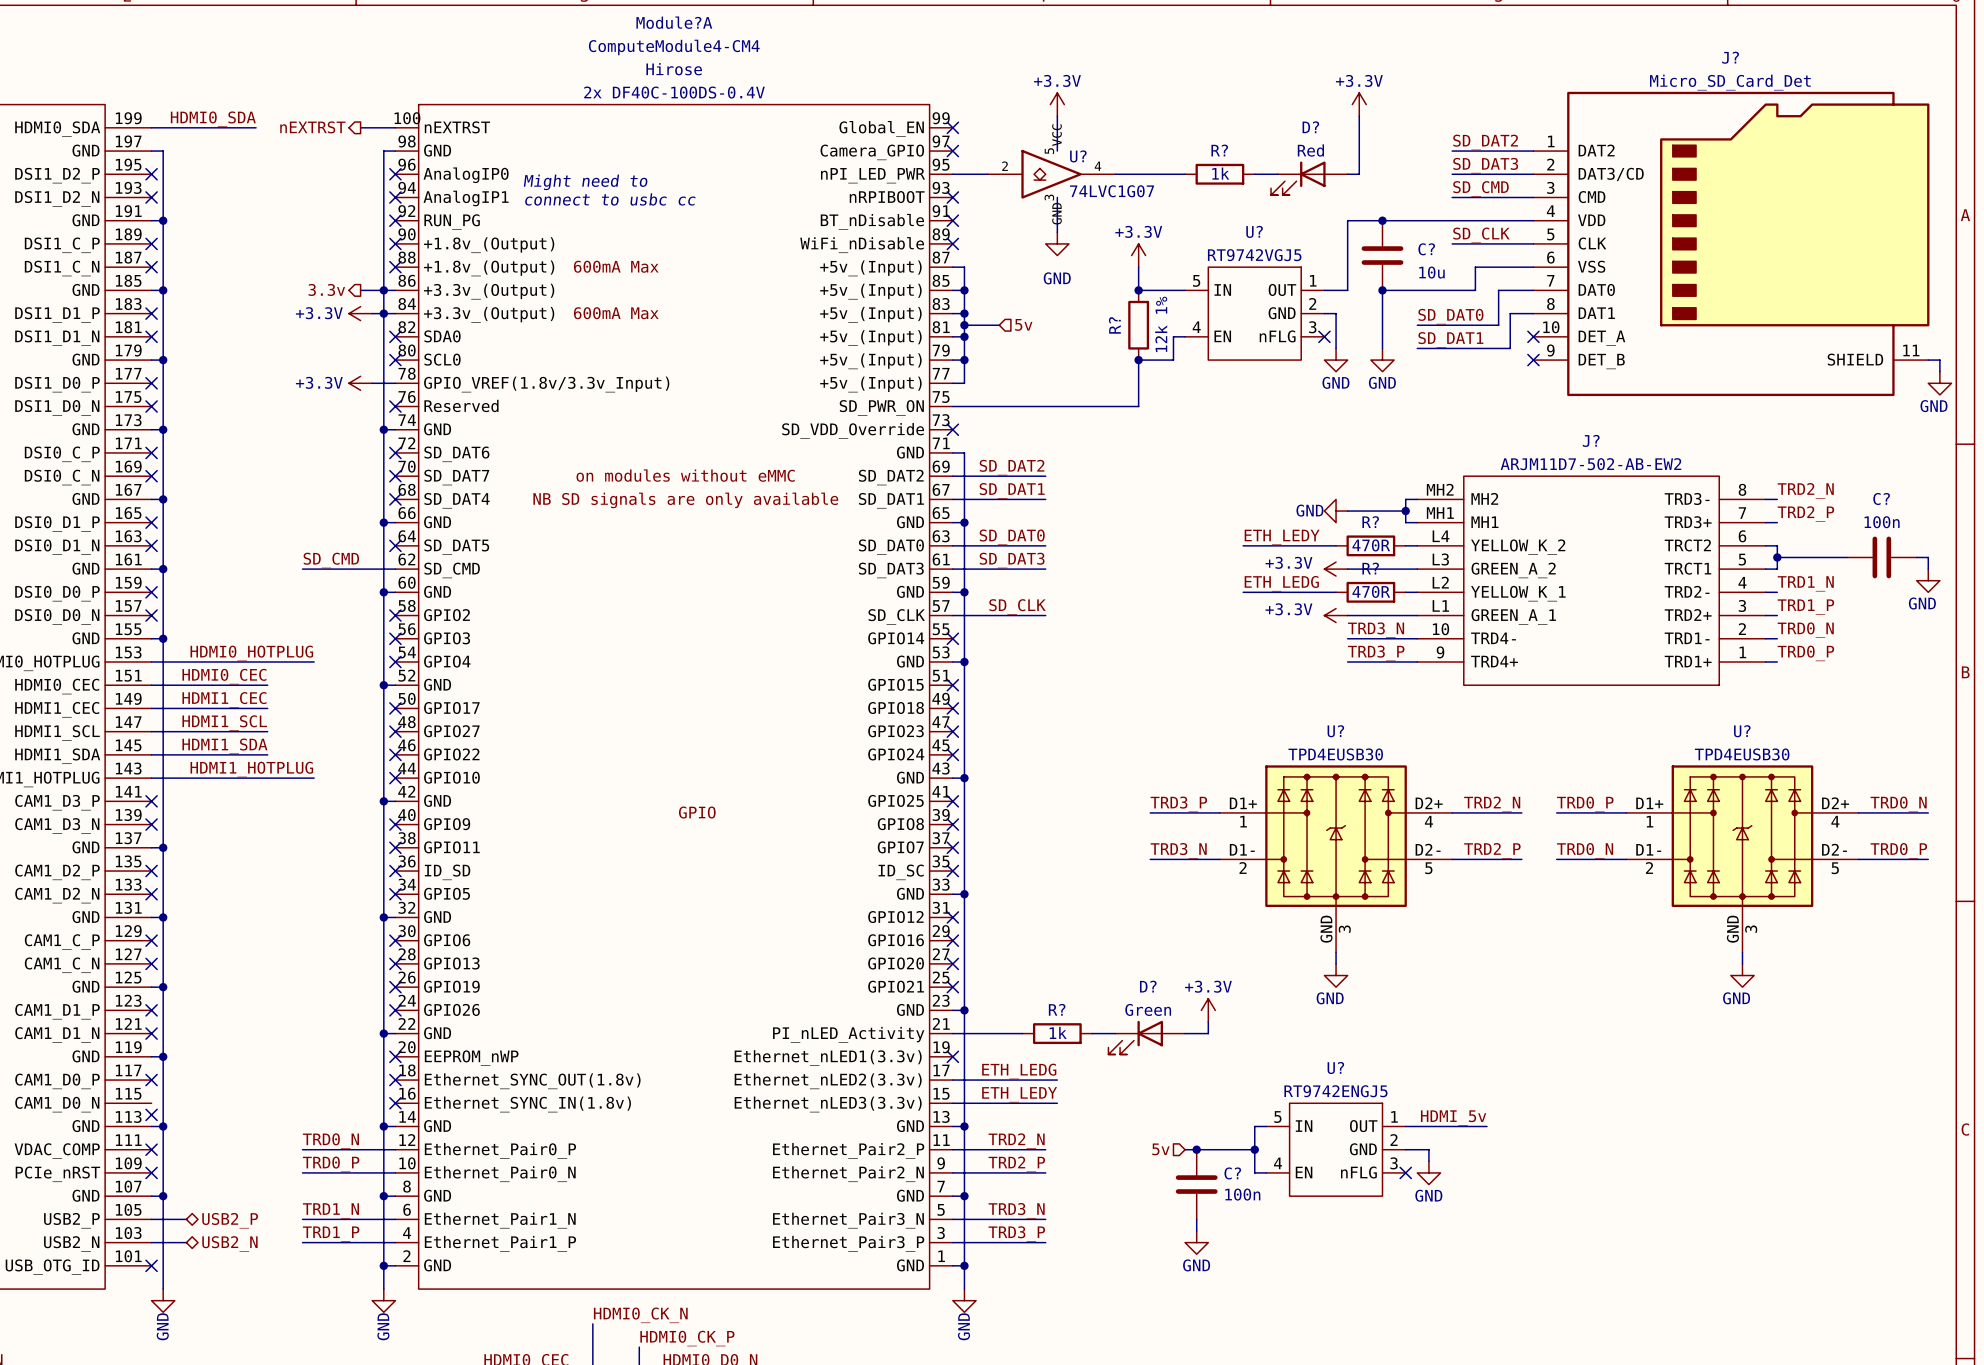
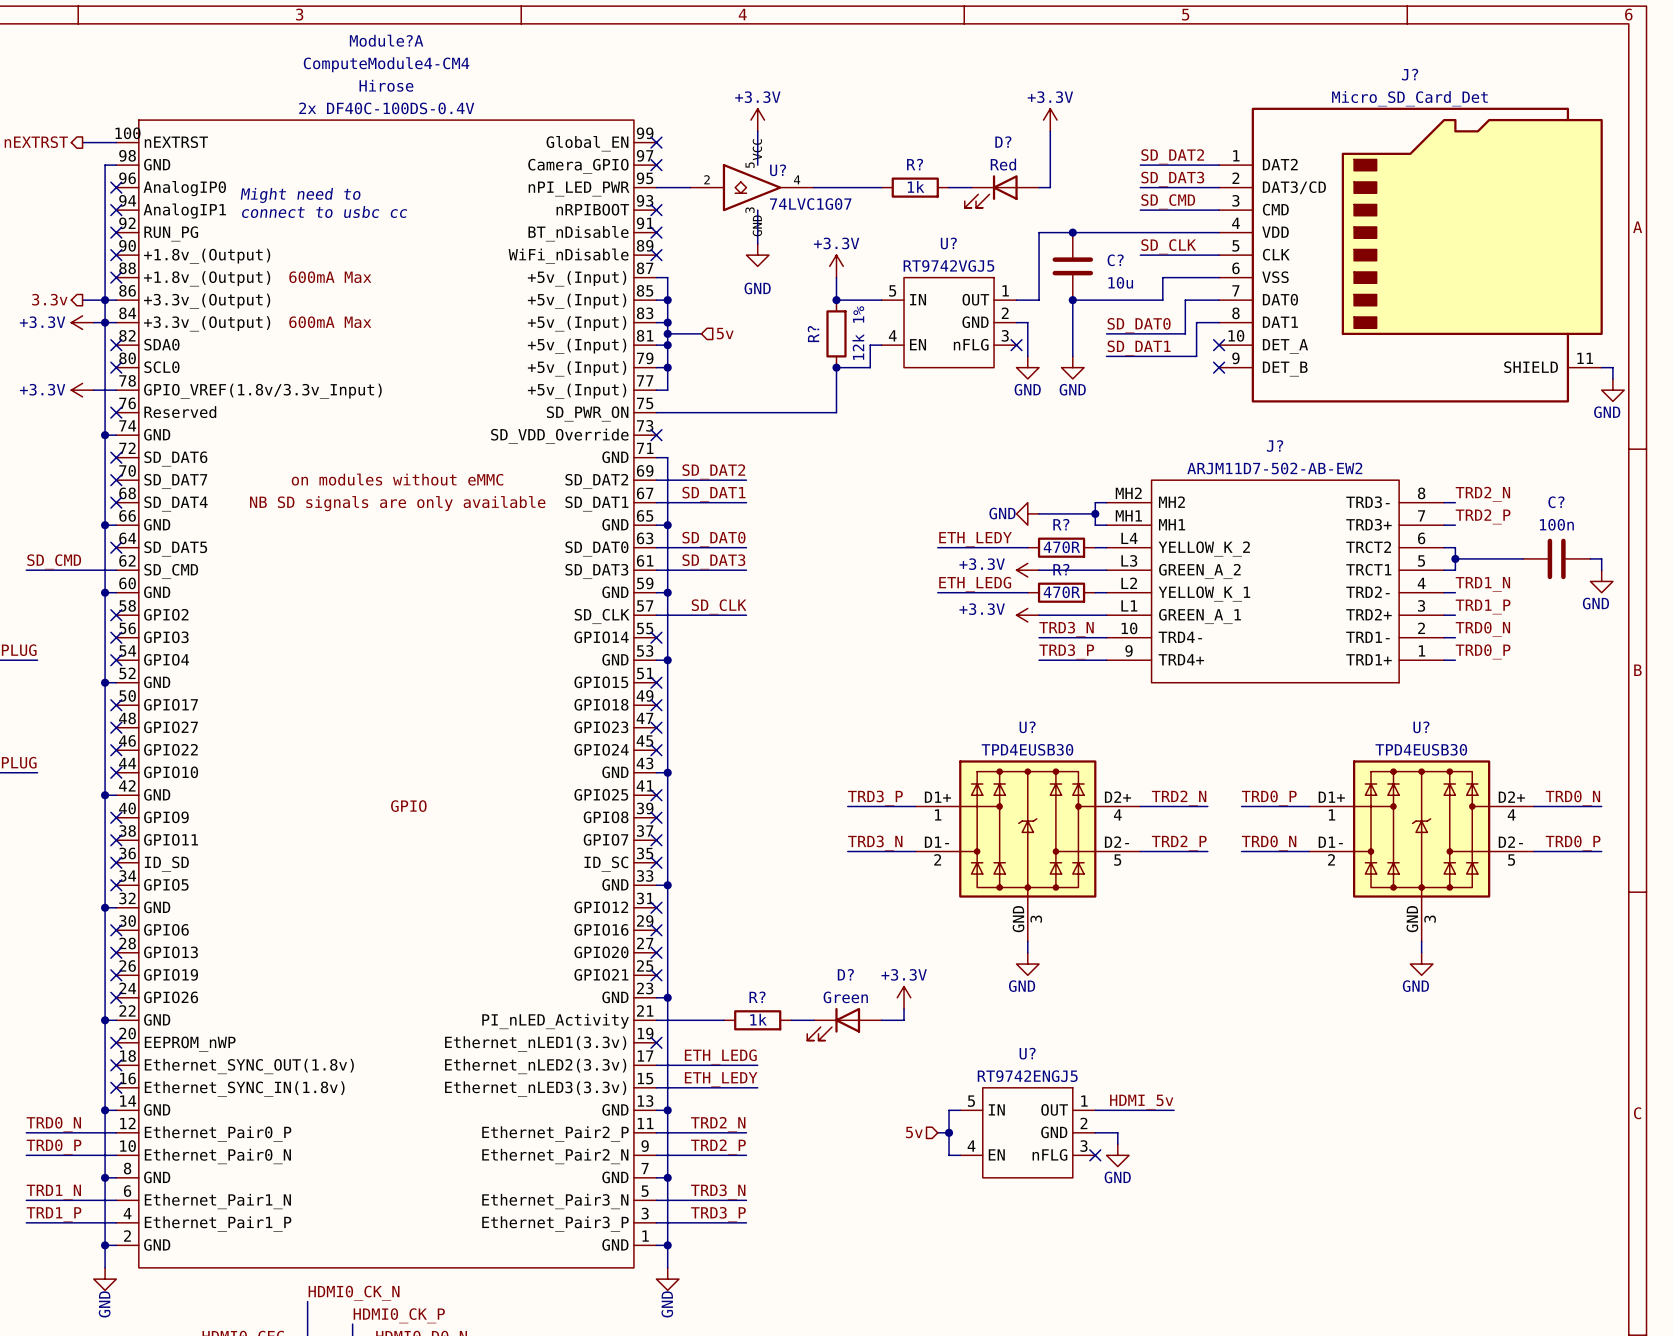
hierarchical label position: 5v (1160, 1149) -> 5v (914, 1132)
wire: (1185, 1149) (1243, 1149) -> none
junction: (1196, 1149) -> none
C?: 100n (1196, 1184) -> none
wire: (1196, 1219) (1196, 1231) -> none
power symbol: GND (1196, 1242) -> none

